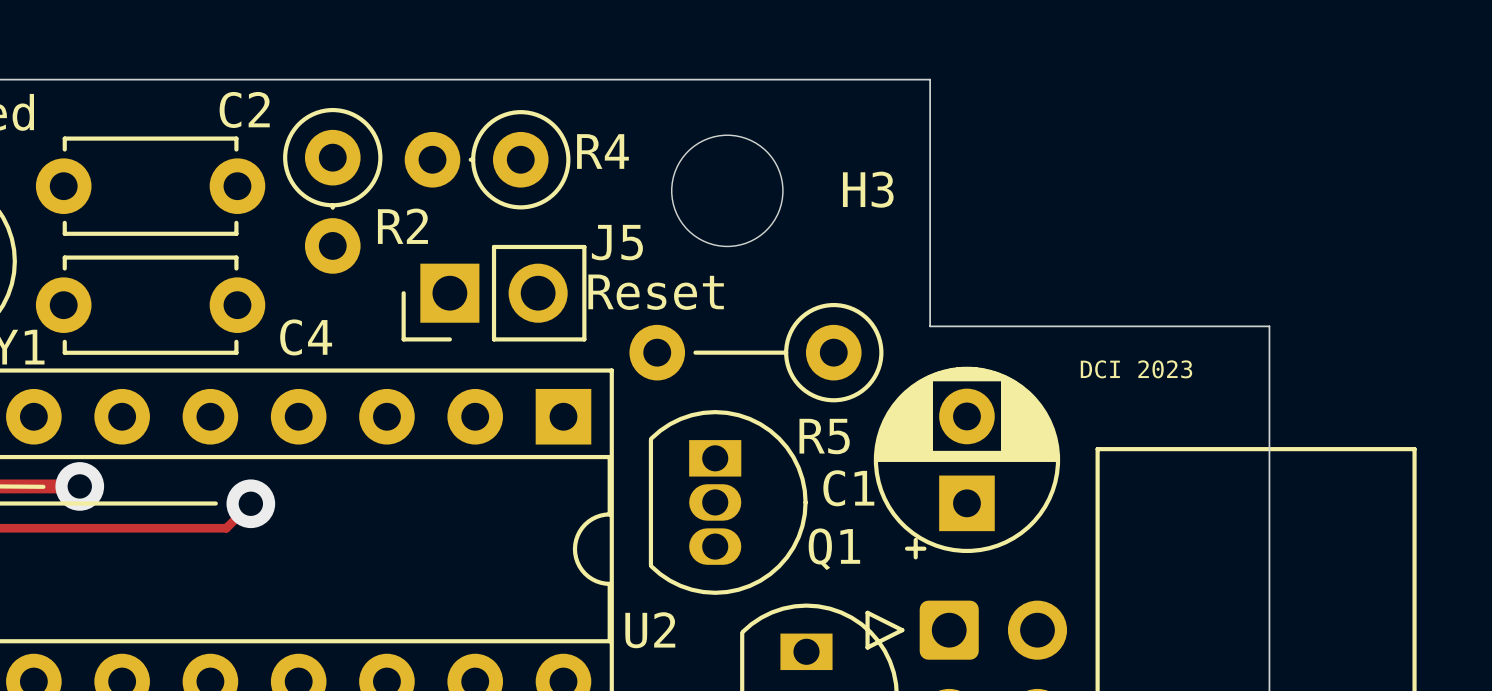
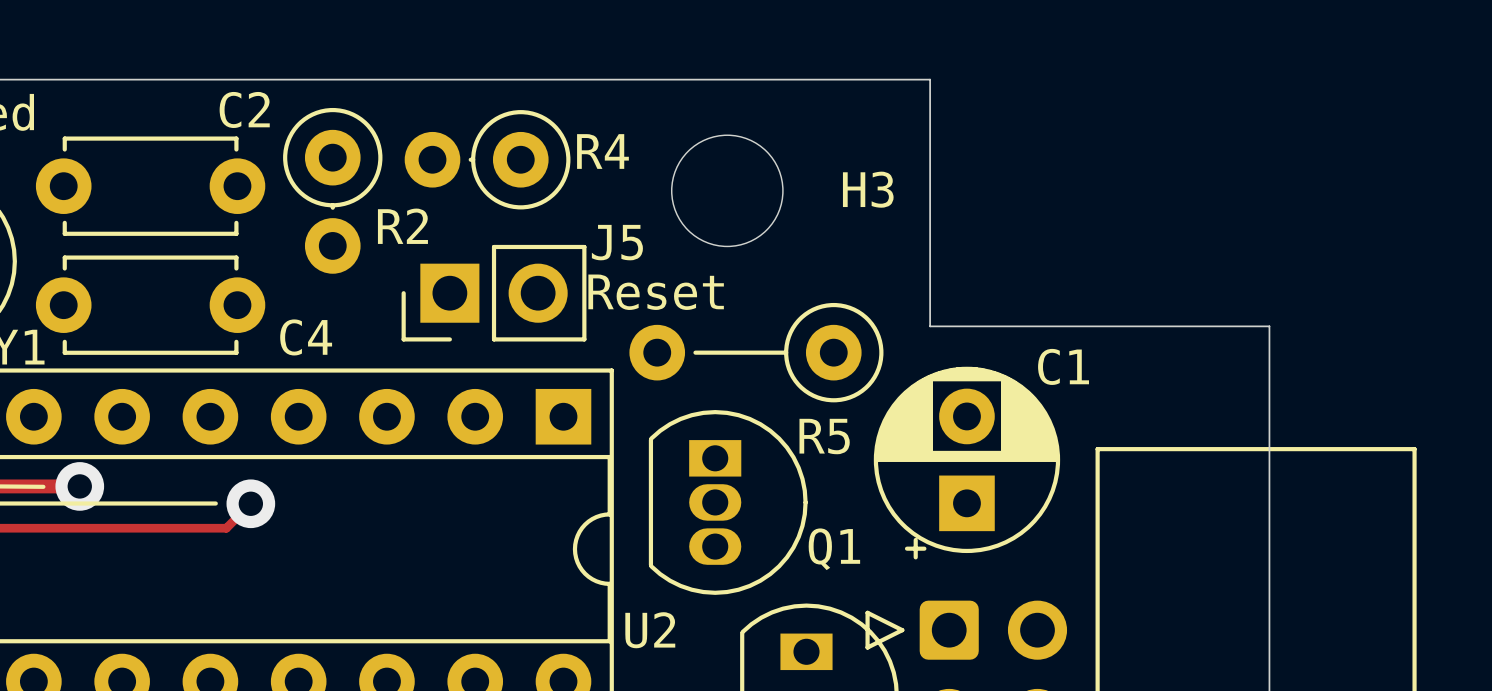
text: DCI 2023 (1136, 369) -> none
C1 name position: C1 (848, 488) -> C1 (1063, 366)

